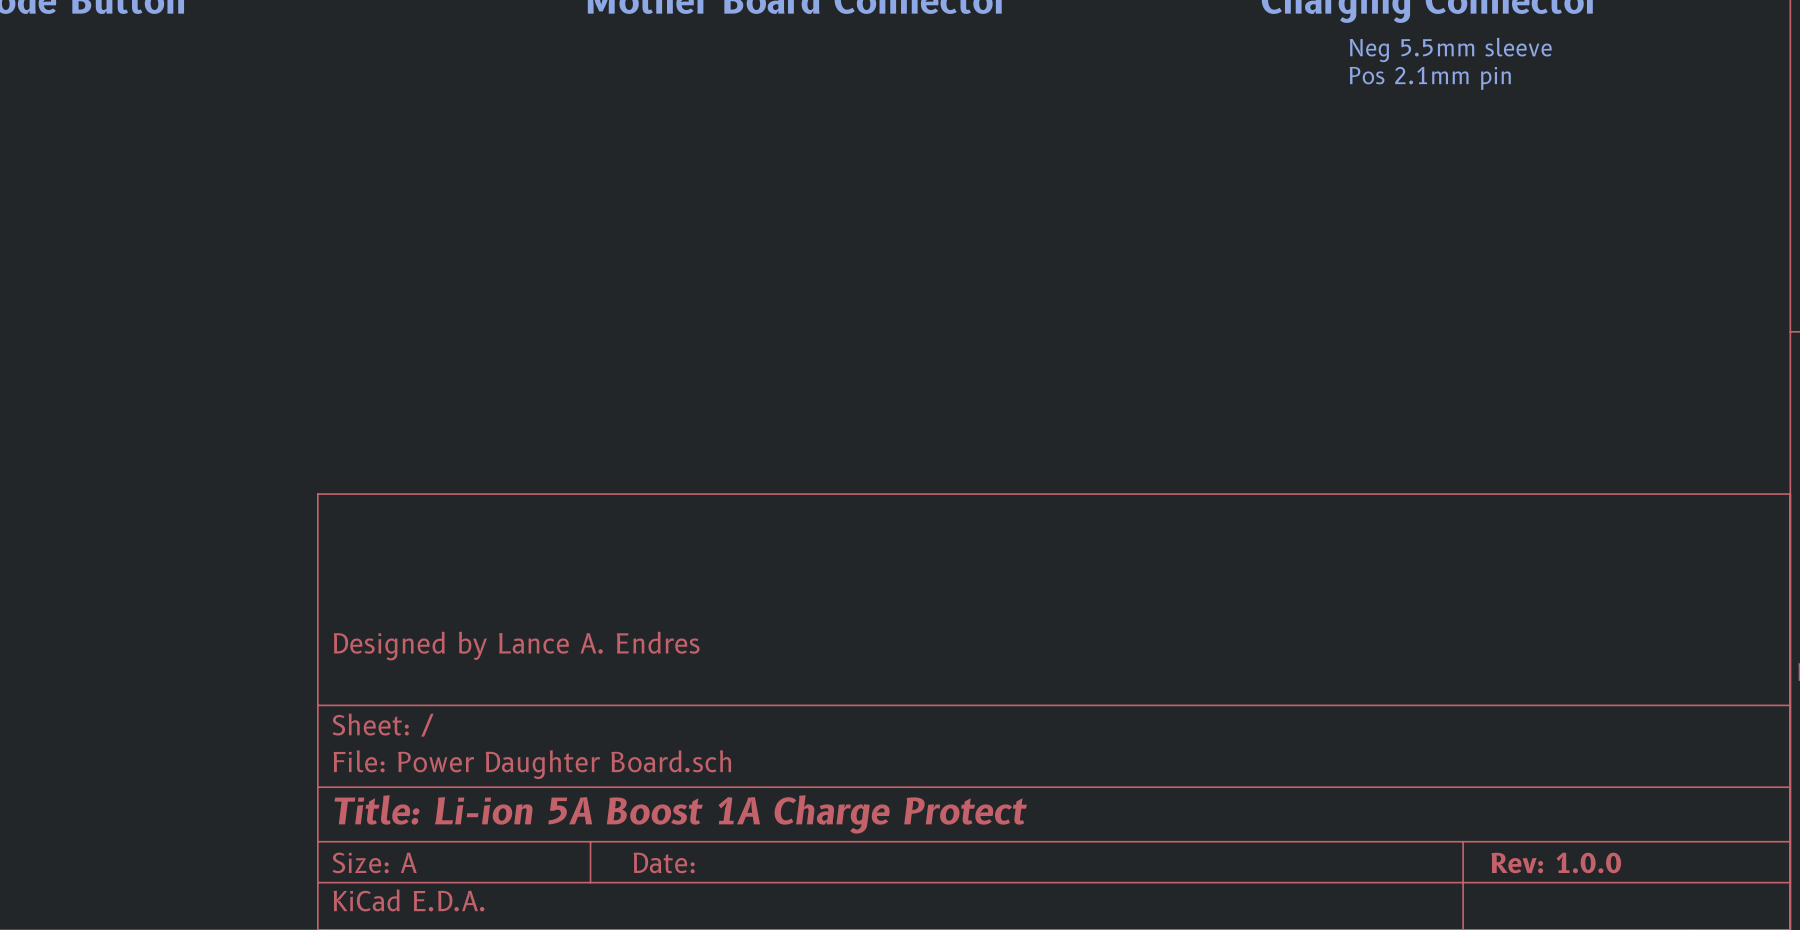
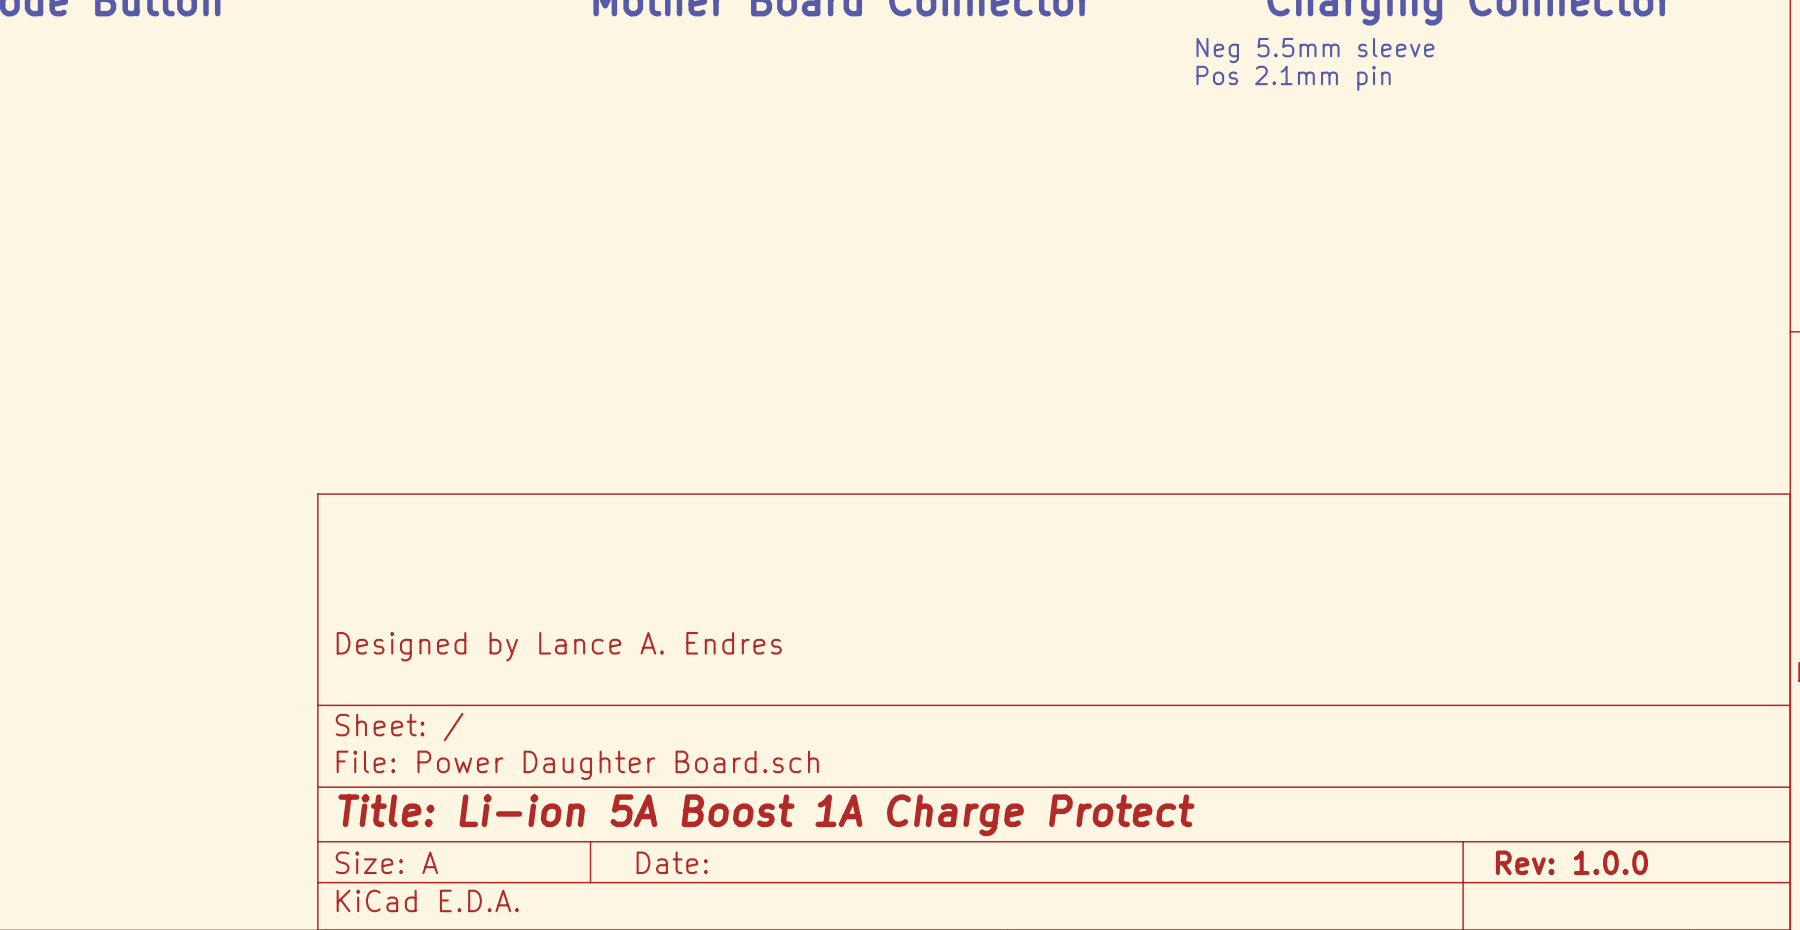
text position: Neg 5.5mm sleeve (1450, 49) -> Neg 5.5mm sleeve (1315, 50)
text position: Pos 2.1mm pin (1430, 78) -> Pos 2.1mm pin (1293, 78)

